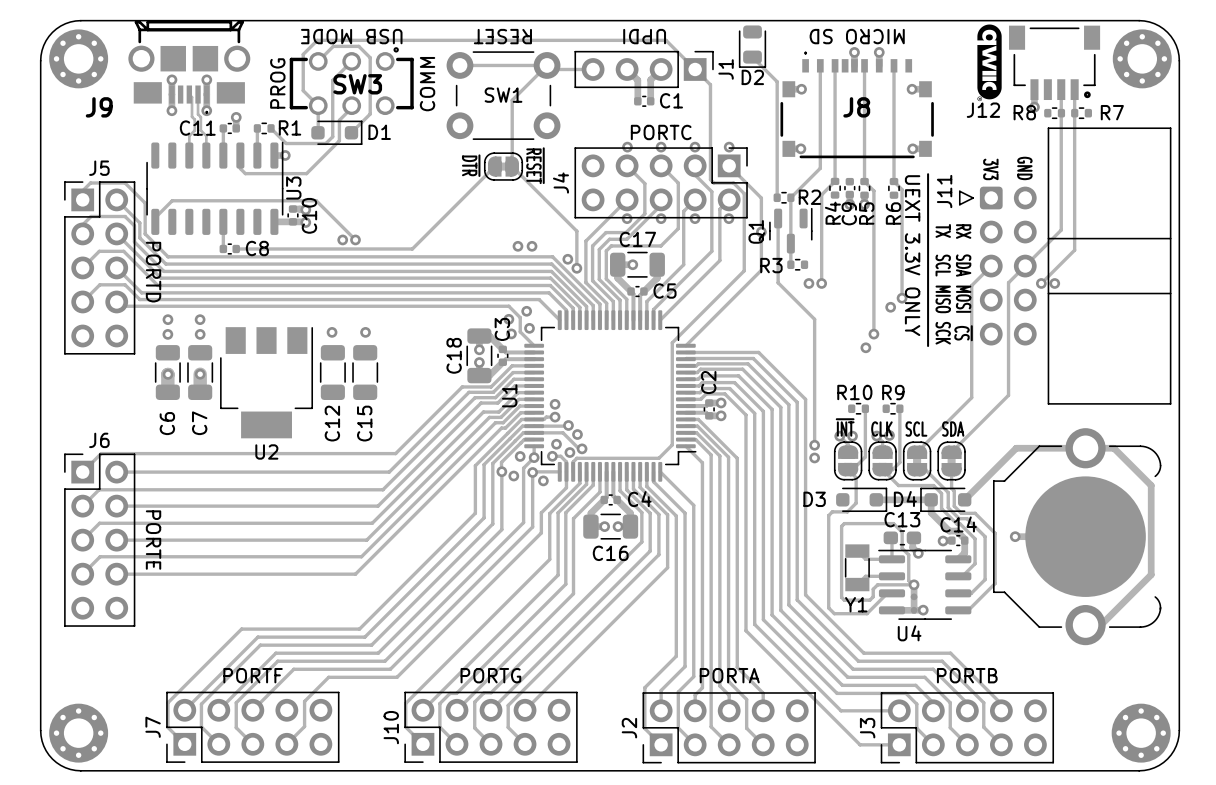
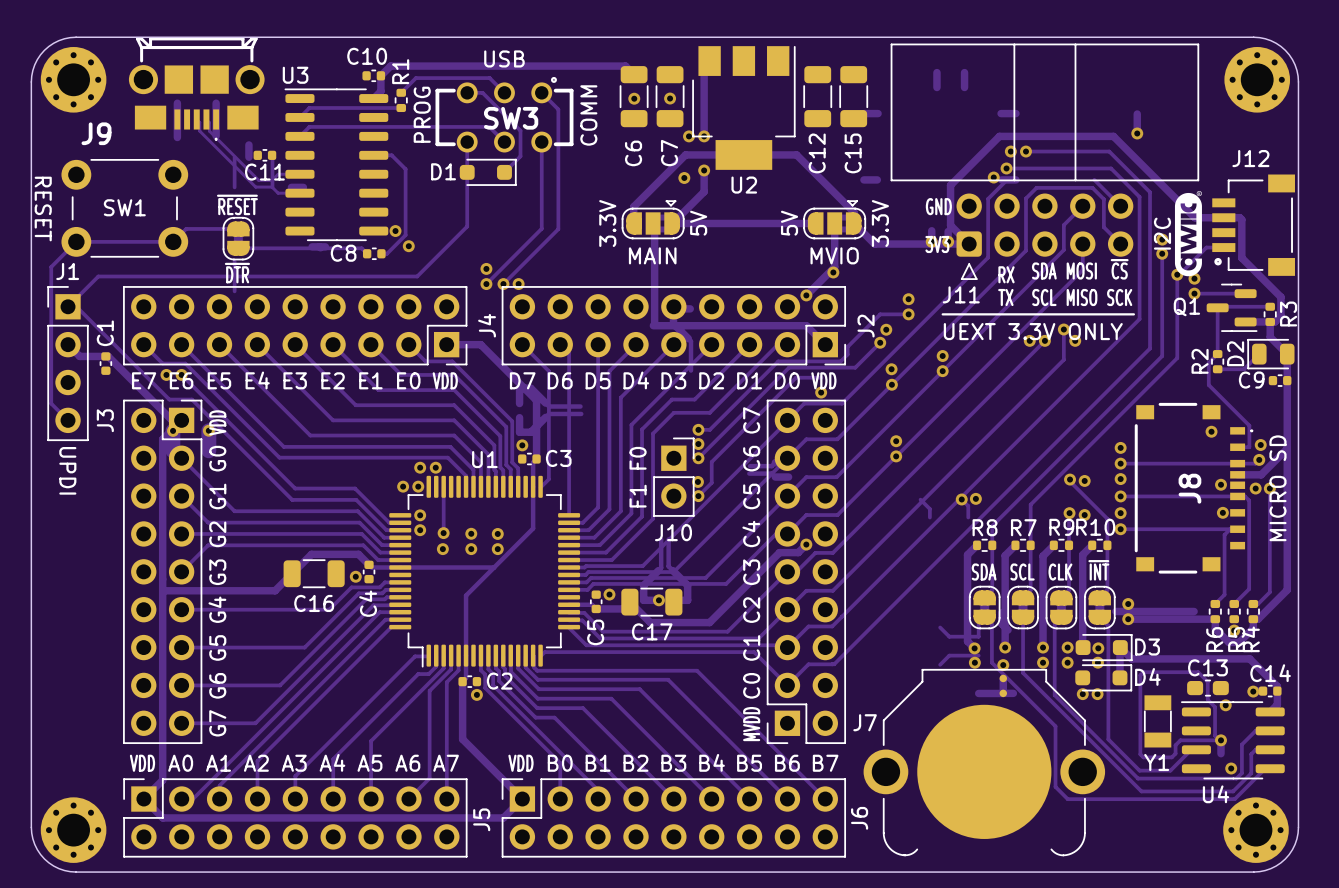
drawing: [977, 24, 1002, 100] -> none
text: USB MODE (351, 36) -> none
text: RESET (502, 36) -> none
text: UPDI (644, 36) -> none
text: MICRO SD (857, 36) -> none
drawing position: (989, 37) -> (1188, 261)
text: none -> USB (504, 58)
track: none -> (709, 61) (704, 66) (704, 136)
D2 rotation: 0° (752, 46) -> 90° clockwise (1270, 354)
D2 position: (752, 46) -> (1270, 354)
via: (854, 52) -> none
via: (879, 52) -> none
track: none -> (634, 74) (625, 66) (390, 66) (380, 75) (380, 91) (373, 98)
track: (752, 57) (777, 81) (777, 197) -> none
track: (318, 61) (333, 46) (358, 46) (370, 57) (370, 114) (351, 132) -> none
track: (351, 61) (332, 80) (332, 136) (326, 143) (286, 143) (271, 128) -> none
J12 rotation: 0° (1054, 62) -> 90° clockwise (1253, 225)
J12 position: (1054, 62) -> (1253, 225)
track: (459, 65) (547, 65) (551, 69) (593, 69) -> none
track: (547, 65) (512, 100) (512, 166) (576, 231) (576, 268) -> none
track: (820, 65) (820, 168) (790, 197) (790, 264) -> none
track: (835, 65) (835, 181) (821, 194) (821, 283) -> none
track: (864, 65) (864, 181) (873, 190) (873, 334) -> none
track: (894, 65) (894, 181) (902, 189) (902, 298) -> none
track: (627, 69) (637, 80) (637, 101) -> none
J1 rotation: 0° (644, 69) -> 90° counterclockwise (68, 363)
J1 position: (644, 69) -> (68, 363)
track: (661, 69) (650, 79) (650, 101) -> none
track: none -> (401, 92) (415, 78) (489, 78) (504, 92)
track: none -> (467, 92) (482, 92) (520, 130) (520, 156) (504, 172)
track: none -> (541, 92) (558, 109) (558, 229) (503, 284)
via: none -> (634, 98)
via: none -> (670, 98)
via: (171, 79) -> none
via: (206, 79) -> none
SW3 position: (351, 81) -> (504, 114)
text position: PROG (277, 83) -> PROG (422, 114)
track: none -> (401, 108) (309, 108) (299, 117)
text position: COMM (427, 84) -> COMM (588, 115)
via: (801, 89) -> none
via: (912, 89) -> none
track: (1061, 89) (1061, 230) (1008, 282) (1008, 395) (951, 452) -> none
track: (1074, 89) (1074, 250) (1041, 283) -> none
track: (198, 94) (198, 114) (200, 117) (200, 130) (206, 135) (206, 155) -> (206, 119) (209, 122) (209, 131) (258, 180) (272, 180) (278, 174) (299, 174)
SW1 position: (503, 95) -> (124, 208)
drawing position: (979, 98) -> (1199, 193)
C1 name position: C1 (671, 100) -> C1 (105, 333)
C1 rotation: 0° (644, 101) -> 90° clockwise (105, 363)
C1 position: (644, 101) -> (105, 363)
track: (192, 104) (194, 130) (189, 135) (189, 155) -> (199, 131) (255, 187) (272, 187) (278, 193) (299, 193)
J8 rotation: 0° (857, 104) -> 90° clockwise (1194, 488)
J8 position: (857, 104) -> (1194, 488)
track: (351, 108) (339, 120) (339, 140) (306, 173) (245, 173) (240, 168) (240, 155) -> none
track: none -> (299, 136) (309, 126) (489, 126) (504, 142)
via: none -> (688, 136)
via: none -> (704, 136)
via: (171, 110) -> none
via: (206, 110) -> none
J12 name position: J12 (983, 110) -> J12 (1250, 158)
R8 name position: R8 (1024, 112) -> R8 (985, 527)
R7 name position: R7 (1112, 112) -> R7 (1023, 527)
R8 position: (1054, 113) -> (984, 545)
R7 position: (1081, 113) -> (1023, 545)
track: none -> (467, 142) (467, 226) (417, 276) (98, 276) (68, 306) (76, 306) (169, 399) (191, 399) (292, 499) (356, 499) (386, 530) (400, 530)
track: none -> (541, 142) (541, 228) (486, 284)
via: (236, 117) -> none
via: none -> (1010, 151)
track: none -> (1025, 151) (1109, 151) (1150, 192) (1150, 348) (832, 664)
via: none -> (1025, 151)
track: none -> (373, 155) (391, 155) (405, 169) (405, 235) (387, 253) (381, 253)
R1 name position: R1 (290, 127) -> R1 (400, 71)
C11 name position: C11 (197, 128) -> C11 (264, 172)
C11 position: (229, 128) -> (264, 155)
R1 rotation: 0° (264, 128) -> 90° clockwise (401, 100)
R1 position: (264, 128) -> (401, 100)
track: (317, 132) (318, 105) (303, 90) (303, 54) (317, 40) (666, 40) (710, 84) (710, 179) (713, 183) (733, 183) (744, 193) (744, 270) (672, 342) (672, 444) (658, 458) (576, 458) (573, 462) (573, 471) -> none
D1 position: (336, 132) -> (488, 172)
D1 name position: D1 (379, 132) -> D1 (443, 171)
text: PORTC (661, 132) -> none
track: none -> (1006, 168) (1111, 168) (1139, 196) (1139, 319) (832, 626) (808, 626) (787, 647) (785, 645) (586, 645) (569, 627)
via: none -> (1006, 168)
track: none -> (704, 170) (704, 191) (672, 223) (815, 223)
via: none -> (993, 177)
J4 footprint: [574, 147, 748, 219] -> [123, 286, 468, 366]
via position: (661, 147) -> (704, 170)
via: (695, 147) -> none
via: (729, 147) -> none
via: (800, 148) -> none
via: (912, 148) -> none
track: none -> (1007, 179) (988, 198) (988, 257) (842, 403) (804, 403) (642, 566) (569, 567)
track: none -> (1094, 179) (1120, 206)
via: (285, 155) -> none
drawing: none -> [1174, 192, 1202, 277]
text rotation: 0° (471, 165) -> 90° counterclockwise (237, 273)
text position: ~{DTR} (471, 165) -> ~{DTR} (237, 273)
text rotation: 0° (535, 165) -> 90° counterclockwise (237, 204)
text position: ~{RESET} (535, 165) -> ~{RESET} (237, 204)
track: (627, 165) (644, 183) (644, 213) (626, 232) (605, 232) (592, 245) (592, 280) (613, 301) (613, 320) -> none
track: (661, 165) (678, 183) (678, 228) (660, 245) (611, 245) (606, 251) (606, 278) (626, 299) (626, 320) -> none
track: (695, 165) (695, 175) (711, 191) (711, 251) (653, 309) (653, 320) -> none
track: (729, 165) (761, 198) (761, 270) (685, 345) -> none
track: (494, 166) (412, 248) (236, 248) -> none
part: (503, 166) -> none
J5 name position: J5 (99, 168) -> J5 (481, 819)
text rotation: 0° (1024, 168) -> 90° counterclockwise (938, 206)
text position: GND (1024, 168) -> GND (938, 206)
text rotation: 0° (990, 169) -> 90° counterclockwise (937, 244)
text position: 3V3 (990, 169) -> 3V3 (937, 244)
track: none -> (1082, 206) (1063, 225) (1063, 249) (836, 477) (806, 477) (705, 577) (591, 577) (586, 582) (569, 582)
text: none -> RESET (43, 209)
line: (928, 174) (928, 346) -> none
J5 footprint: [64, 181, 136, 355] -> [123, 778, 468, 858]
J4 name position: J4 (560, 183) -> J4 (487, 325)
part: none -> (653, 219)
part: none -> (834, 219)
text: none -> 5V (698, 223)
text: none -> 5V (789, 223)
U3 rotation: 0° (214, 188) -> 90° counterclockwise (336, 164)
U3 position: (214, 188) -> (336, 164)
U3 name position: U3 (293, 188) -> U3 (295, 75)
text: none -> 3.3V (607, 223)
track: none -> (633, 223) (633, 206) (685, 154) (796, 154) (854, 212) (854, 223) (874, 244) (969, 244) (950, 225) (950, 185) (999, 136) (1113, 136) (1194, 217) (1239, 217) (1241, 219) (1241, 257) (1280, 297) (1280, 316) (1274, 321) (1245, 321)
track: none -> (653, 223) (654, 324)
track: none -> (834, 223) (834, 267) (806, 295)
text: none -> 3.3V (880, 223)
R4 position: (835, 188) -> (1253, 611)
C9 rotation: 0° (849, 188) -> 90° clockwise (1280, 380)
C9 position: (849, 188) -> (1280, 380)
R5 position: (864, 188) -> (1234, 611)
R6 position: (894, 188) -> (1215, 611)
track: none -> (238, 228) (186, 228) (173, 241) (76, 241) (51, 267) (51, 403) (68, 420)
via: none -> (395, 231)
R2 rotation: 0° (784, 197) -> 90° clockwise (1217, 361)
R2 position: (784, 197) -> (1217, 361)
R2 name position: R2 (809, 197) -> R2 (1200, 361)
text: none -> I2C (1162, 233)
track: (73, 199) (90, 183) (125, 183) (145, 203) (145, 233) (168, 256) (552, 256) (599, 304) (599, 320) -> none
track: (116, 199) (139, 222) (139, 237) (165, 264) (551, 264) (593, 305) (593, 320) -> none
track: (627, 199) (585, 241) (585, 282) (606, 303) (606, 320) -> none
track: (661, 199) (661, 205) (626, 239) (609, 239) (599, 249) (599, 279) (620, 300) (620, 320) -> none
track: (695, 199) (683, 211) (683, 264) (646, 301) (646, 320) -> none
track: (729, 199) (719, 209) (719, 260) (660, 320) -> none
part: none -> (238, 238)
via: none -> (1162, 239)
track: none -> (1082, 244) (1082, 269) (896, 456)
track: none -> (1120, 244) (1103, 227) (1103, 199) (1092, 187) (1036, 187) (1025, 198) (1025, 250) (837, 439) (806, 439) (673, 572) (588, 572) (585, 574) (569, 574)
via: none -> (408, 246)
via: (305, 209) -> none
track: none -> (1223, 247) (1206, 247) (1177, 274) (1177, 358) (1030, 504) (1030, 590) (1023, 597)
track: none -> (238, 248) (361, 248) (367, 253)
C10 rotation: 0° (292, 215) -> 90° clockwise (373, 75)
C10 position: (292, 215) -> (373, 75)
C10 name position: C10 (309, 215) -> C10 (367, 56)
track: none -> (1162, 253) (1162, 356) (992, 526) (992, 590) (984, 597)
via: none -> (1162, 253)
text: none -> MAIN (652, 255)
text: none -> MVIO (834, 255)
via: (627, 218) -> none
via: (661, 218) -> none
via: (695, 218) -> none
via: (728, 218) -> none
track: (778, 218) (778, 282) (814, 319) (814, 445) -> none
track: (155, 221) (155, 217) (172, 200) (316, 200) (355, 239) -> none
track: (274, 221) (305, 221) -> none
via: (305, 222) -> none
via: none -> (486, 268)
Q1 rotation: 0° (790, 230) -> 90° clockwise (1232, 307)
Q1 position: (790, 230) -> (1232, 307)
text rotation: 0° (943, 230) -> 90° counterclockwise (1005, 297)
text position: TX (943, 230) -> TX (1005, 297)
text rotation: 0° (963, 231) -> 90° counterclockwise (1006, 274)
text position: RX (963, 231) -> RX (1006, 274)
track: (73, 233) (91, 216) (125, 216) (134, 225) (134, 241) (163, 271) (551, 271) (586, 306) (586, 320) -> none
track: (116, 233) (160, 278) (550, 278) (579, 307) (579, 320) -> none
via: none -> (1177, 274)
via: none -> (1194, 278)
via: (342, 239) -> none
via: (355, 239) -> none
C17 name position: C17 (637, 239) -> C17 (652, 631)
via: none -> (486, 284)
via: none -> (503, 284)
via: none -> (518, 284)
via: (517, 246) -> none
via: (532, 246) -> none
C8 position: (229, 248) -> (374, 253)
C8 name position: C8 (257, 248) -> C8 (343, 253)
track: none -> (1194, 293) (1245, 293)
via: none -> (1194, 293)
via: none -> (806, 295)
text rotation: 0° (912, 255) -> 90° counterclockwise (1033, 331)
via: none -> (908, 299)
via: (567, 259) -> none
track: none -> (1270, 306) (1217, 307) (1217, 354) (1208, 362) (1208, 385) (1249, 425) (1249, 446) (1237, 447)
via: (632, 264) -> none
C17 position: (637, 264) -> (651, 602)
track: (657, 264) (657, 278) (640, 295) (640, 320) -> none
R3 rotation: 0° (797, 264) -> 90° clockwise (1270, 314)
R3 position: (797, 264) -> (1270, 314)
R3 name position: R3 (771, 265) -> R3 (1288, 314)
text rotation: 0° (943, 265) -> 90° counterclockwise (1044, 297)
text rotation: 0° (963, 265) -> 90° counterclockwise (1044, 271)
text position: SDA (963, 265) -> SDA (1044, 271)
track: (991, 266) (971, 285) (971, 397) (917, 452) -> none
J11 rotation: 0° (1065, 266) -> 90° counterclockwise (1044, 161)
J11 position: (1065, 266) -> (1044, 161)
track: (82, 267) (99, 251) (123, 251) (157, 285) (550, 285) (573, 308) (573, 320) -> none
track: (116, 267) (141, 292) (549, 292) (566, 310) (566, 320) -> none
via: (576, 268) -> none
track: none -> (908, 314) (880, 314) (847, 346) (847, 354) (840, 361) (778, 361) (709, 429) (698, 429)
via: none -> (908, 314)
line: none -> (942, 314) (1133, 314)
text: PORTD (153, 272) -> none
track: none -> (1270, 321) (1270, 337) (1287, 354) (1287, 590) (1258, 619) (1253, 619) (1253, 628) (1239, 642) (1228, 642) (1215, 628) (1215, 619) (1127, 619)
track: none -> (653, 325) (806, 325) (825, 344)
via: (821, 283) -> none
track: none -> (1063, 329) (1063, 359) (832, 590) (806, 590) (758, 638) (600, 638) (582, 620) (569, 620)
via: none -> (1063, 329)
via: (1041, 283) -> none
via: (1054, 283) -> none
C5 rotation: 0° (637, 291) -> 90° clockwise (596, 601)
C5 position: (637, 291) -> (596, 601)
via: none -> (1029, 340)
track: none -> (1044, 340) (832, 552) (815, 552) (796, 571) (787, 571) (727, 631) (603, 631) (584, 612) (569, 612)
via: none -> (1044, 340)
via: none -> (1075, 340)
track: none -> (880, 342) (855, 367) (789, 367) (698, 458)
via: none -> (880, 342)
track: none -> (68, 344) (79, 356) (108, 356) (172, 420) (181, 420) (162, 439) (162, 780) (143, 799) (162, 817) (503, 817) (522, 799) (462, 739) (462, 681) (466, 678) (466, 595) (533, 528) (533, 462) (536, 459) (536, 400) (480, 344) (446, 344)
track: none -> (143, 344) (162, 363) (185, 363) (279, 457) (447, 457) (466, 475) (466, 487)
track: none -> (181, 344) (283, 446) (450, 446) (473, 469) (473, 487)
track: none -> (219, 344) (310, 435) (454, 435) (480, 462) (480, 487)
track: none -> (257, 344) (333, 420) (454, 420) (488, 454) (488, 487)
track: none -> (295, 344) (355, 405) (454, 405) (494, 445) (495, 486)
track: none -> (333, 344) (378, 390) (454, 390) (500, 436) (500, 467) (503, 470) (503, 487)
track: none -> (370, 344) (401, 374) (454, 374) (506, 427) (506, 464) (510, 469) (510, 487)
track: none -> (408, 344) (425, 361) (452, 361) (512, 421) (512, 462) (518, 468) (518, 487)
track: none -> (522, 344) (548, 371) (548, 479) (540, 487)
track: none -> (560, 344) (569, 353) (569, 515)
track: none -> (598, 344) (598, 507) (582, 522) (569, 522)
track: none -> (635, 344) (609, 371) (609, 509) (588, 530) (569, 530)
track: none -> (673, 344) (620, 397) (620, 511) (594, 537) (569, 537)
track: none -> (711, 344) (631, 424) (631, 513) (599, 545) (569, 545)
track: none -> (749, 344) (694, 399) (671, 399) (642, 429) (642, 516) (606, 552) (569, 552)
track: none -> (787, 344) (777, 344) (709, 412) (673, 412) (653, 433) (653, 518) (611, 560) (569, 560)
via: (902, 298) -> none
text rotation: 0° (943, 299) -> 90° counterclockwise (1082, 297)
text position: MISO (943, 299) -> MISO (1082, 297)
text rotation: 0° (963, 299) -> 90° counterclockwise (1081, 271)
text position: MOSI (963, 299) -> MOSI (1081, 271)
track: (82, 301) (99, 284) (125, 284) (139, 299) (539, 299) (559, 320) -> none
track: (107, 301) (111, 306) (508, 306) (520, 317) (520, 331) (534, 345) -> none
track: none -> (1259, 354) (1244, 369) (1217, 369)
via: none -> (942, 356)
via: (890, 307) -> none
via: (526, 311) -> none
via: none -> (891, 369)
via: (167, 319) -> none
via: (200, 319) -> none
via: (508, 319) -> none
via: none -> (942, 371)
via: none -> (166, 374)
track: none -> (181, 374) (295, 488) (355, 488) (389, 522) (400, 522)
via: none -> (181, 374)
track: none -> (821, 377) (796, 377) (711, 462) (711, 482) (698, 496)
via: (529, 328) -> none
text: none -> E7 (144, 380)
text: none -> E6 (181, 380)
text: none -> E5 (219, 380)
text: none -> E4 (257, 380)
text: none -> E3 (295, 380)
text: none -> E2 (333, 380)
text: none -> E1 (370, 380)
text: none -> E0 (408, 380)
text: none -> VDD (445, 380)
text: none -> D7 (522, 380)
text: none -> D6 (560, 380)
text: none -> D5 (598, 380)
text: none -> D4 (636, 380)
text: none -> D3 (673, 380)
text: none -> D2 (711, 380)
text: none -> D1 (749, 380)
text: none -> D0 (787, 380)
text: none -> VDD (823, 380)
via: (332, 332) -> none
via: (365, 332) -> none
via: none -> (891, 384)
via: (511, 333) -> none
text rotation: 0° (943, 333) -> 90° counterclockwise (1119, 297)
text position: SCK (943, 333) -> SCK (1119, 297)
text rotation: 0° (963, 333) -> 90° counterclockwise (1119, 269)
text position: ~{CS} (963, 333) -> ~{CS} (1119, 269)
via: (167, 334) -> none
via: (200, 334) -> none
via: (873, 334) -> none
via: none -> (821, 392)
via: (865, 347) -> none
via: (479, 349) -> none
track: (685, 352) (758, 352) (805, 399) (805, 594) (863, 653) (950, 653) (1001, 704) (1001, 710) -> none
C18: (479, 355) -> none
C3 rotation: 0° (502, 355) -> 90° clockwise (529, 459)
C3 position: (502, 355) -> (529, 459)
track: (685, 359) (753, 358) (797, 402) (797, 599) (858, 661) (942, 661) (983, 702) (983, 727) (1001, 744) -> none
via: (479, 362) -> none
text: none -> C7 (751, 420)
track: (534, 365) (512, 365) (491, 386) (462, 386) (395, 453) (101, 453) (82, 472) -> none
track: (685, 365) (696, 365) (698, 363) (747, 363) (788, 404) (788, 604) (853, 669) (933, 669) (967, 703) (967, 710) -> none
text: none -> VDD (217, 422)
C6 position: (167, 372) -> (634, 96)
C7 position: (200, 372) -> (670, 96)
C12 position: (332, 372) -> (817, 96)
C15 position: (365, 372) -> (853, 96)
track: (534, 372) (513, 372) (493, 392) (469, 392) (389, 472) (116, 472) -> none
track: (685, 372) (697, 372) (700, 369) (742, 369) (780, 407) (780, 610) (847, 677) (924, 677) (950, 702) (950, 727) (967, 744) -> none
via: none -> (698, 429)
via: none -> (1211, 431)
track: (534, 379) (513, 379) (495, 397) (475, 397) (382, 489) (99, 489) (82, 506) -> none
track: (685, 379) (698, 379) (701, 375) (738, 375) (772, 409) (772, 615) (842, 685) (915, 685) (933, 702) (933, 710) -> none
U2 position: (266, 382) -> (743, 107)
via: none -> (896, 441)
track: (534, 385) (514, 385) (497, 403) (481, 403) (377, 506) (116, 506) -> none
track: (685, 385) (699, 385) (702, 382) (734, 382) (763, 411) (763, 619) (837, 693) (906, 693) (916, 704) (916, 728) (933, 744) -> none
via: none -> (698, 444)
via: none -> (522, 445)
via: none -> (1260, 444)
via: none -> (1120, 447)
track: none -> (1287, 448) (1261, 474) (1237, 474)
track: (534, 392) (518, 392) (498, 412) (483, 412) (372, 523) (99, 523) (82, 540) -> none
track: (685, 392) (699, 392) (703, 388) (729, 388) (754, 413) (754, 624) (841, 710) (899, 710) -> none
U1 rotation: 0° (610, 396) -> 90° clockwise (484, 571)
U1 position: (610, 396) -> (484, 571)
track: none -> (896, 456) (837, 515) (806, 515) (787, 533) (776, 533) (726, 583) (593, 583) (587, 589) (569, 589)
via: none -> (896, 456)
track: none -> (181, 458) (234, 511) (357, 511) (384, 537) (400, 537)
text: none -> F0 (638, 458)
via: none -> (698, 458)
text: none -> G0 (217, 458)
track: (534, 399) (519, 399) (501, 417) (489, 417) (366, 540) (116, 540) -> none
track: (685, 399) (700, 399) (706, 393) (724, 393) (745, 415) (745, 630) (860, 744) (899, 744) -> none
text: none -> C6 (751, 458)
track: none -> (1259, 459) (1255, 463) (1120, 463)
via: none -> (1259, 459)
via: (721, 402) -> none
via: none -> (1120, 463)
via: (555, 404) -> none
track: (534, 406) (519, 406) (503, 422) (495, 422) (361, 556) (100, 556) (82, 574) -> none
via: none -> (420, 467)
via: none -> (435, 467)
R10 position: (858, 408) -> (1099, 545)
track: (865, 408) (865, 457) (852, 469) (848, 469) (856, 477) (856, 503) (847, 511) (832, 511) (828, 515) (828, 608) (834, 613) (867, 613) (887, 593) (891, 593) -> none
R9 position: (893, 408) -> (1061, 545)
track: (899, 408) (899, 462) (892, 469) (882, 469) (898, 485) (933, 485) (941, 493) (941, 508) (975, 538) (975, 563) (962, 576) (958, 576) -> none
C2 rotation: 0° (709, 409) -> 90° clockwise (469, 681)
C2 position: (709, 409) -> (469, 681)
text: none -> UPDI (67, 470)
track: (534, 412) (520, 412) (505, 428) (501, 428) (355, 574) (116, 574) -> none
via: (721, 415) -> none
track: (555, 417) (546, 417) (544, 419) (521, 419) (475, 465) (475, 513) (359, 629) (241, 629) (167, 702) (167, 727) (184, 744) -> none
via: (555, 417) -> none
via: none -> (1120, 479)
track: none -> (1070, 479) (1107, 518) (1107, 590) (1099, 597)
via: none -> (1070, 479)
track: (685, 419) (698, 419) (737, 458) (737, 667) (763, 693) (763, 710) -> none
via: none -> (1084, 480)
via: none -> (697, 481)
via: none -> (1220, 484)
via: none -> (403, 486)
via: none -> (418, 486)
track: none -> (443, 486) (443, 533)
track: (568, 425) (522, 426) (484, 464) (484, 517) (364, 637) (257, 637) (184, 710) -> none
via: (568, 425) -> none
text: none -> MICRO SD (1277, 488)
track: (685, 426) (697, 426) (728, 457) (728, 681) (746, 699) (746, 728) (763, 744) -> none
via: none -> (1255, 488)
track: none -> (1269, 488) (1269, 592) (1258, 603) (1253, 603)
via: none -> (1269, 488)
text position: ~{INT} (845, 427) -> ~{INT} (1098, 570)
text position: CLK (881, 429) -> CLK (1060, 572)
text position: SCL (916, 429) -> SCL (1022, 572)
text position: SDA (953, 429) -> SDA (984, 572)
track: none -> (181, 496) (208, 522) (359, 522) (382, 545) (400, 545)
via: none -> (698, 496)
track: (685, 432) (696, 432) (719, 456) (719, 686) (729, 695) (729, 710) -> none
text: none -> G1 (217, 496)
text: none -> F1 (638, 496)
text: none -> C5 (751, 496)
track: none -> (1120, 496) (1245, 496) (1249, 500) (1249, 589) (1234, 603)
via: none -> (1120, 496)
via: (577, 434) -> none
via: (839, 436) -> none
via: (852, 436) -> none
track: (534, 439) (524, 439) (501, 462) (501, 529) (378, 653) (275, 653) (218, 710) -> none
track: (685, 439) (695, 439) (711, 454) (711, 726) (729, 744) -> none
J6 name position: J6 (99, 440) -> J6 (859, 818)
via: (556, 444) -> none
via: (814, 445) -> none
track: (534, 446) (534, 457) (523, 468) (523, 522) (384, 661) (277, 661) (236, 702) (236, 727) (252, 744) -> none
track: (685, 446) (702, 462) (702, 687) (695, 695) (695, 710) -> none
track: (582, 448) (579, 448) (562, 432) (523, 432) (492, 463) (492, 523) (371, 645) (260, 645) (201, 704) (201, 726) (218, 744) -> none
via: (582, 448) -> none
track: none -> (1069, 513) (1069, 590) (1061, 597)
via: none -> (1069, 513)
via: none -> (1120, 513)
via: none -> (1222, 512)
via: none -> (1084, 515)
via: none -> (420, 515)
via: (569, 452) -> none
J6 footprint: [64, 453, 136, 627] -> [501, 778, 847, 858]
via: (520, 456) -> none
track: (552, 456) (560, 456) (566, 461) (566, 487) (541, 512) (541, 532) (397, 677) (328, 677) (304, 701) (304, 726) (286, 744) -> none
via: (552, 456) -> none
via: (534, 457) -> none
via: (814, 457) -> none
part: (848, 460) -> none
part: (882, 460) -> none
part: (917, 460) -> none
part: (951, 460) -> none
track: none -> (1120, 529) (1237, 529)
via: none -> (1120, 529)
track: none -> (1230, 529) (1224, 534) (1224, 594) (1215, 603)
via: none -> (420, 530)
via: none -> (443, 533)
via: none -> (471, 533)
track: none -> (181, 533) (361, 533) (380, 552) (400, 552)
text: none -> G2 (217, 534)
via: none -> (497, 533)
text: none -> C4 (751, 534)
track: (917, 469) (925, 469) (948, 492) (948, 507) (959, 518) (967, 518) (985, 536) (985, 579) (971, 593) (958, 593) -> none
track: (951, 469) (954, 506) (961, 513) (975, 513) (995, 533) (995, 583) (968, 610) (953, 610) -> none
via: (501, 471) -> none
track: (559, 471) (532, 472) (532, 526) (390, 669) (293, 669) (252, 710) -> none
track: (579, 471) (579, 483) (549, 513) (549, 559) (405, 703) (405, 727) (422, 744) -> none
track: (586, 471) (586, 484) (558, 512) (558, 575) (422, 710) -> none
track: (593, 471) (593, 485) (565, 512) (565, 584) (456, 693) (450, 693) (439, 703) (439, 727) (456, 744) -> none
track: (599, 471) (599, 492) (573, 518) (573, 593) (456, 710) -> none
track: (620, 471) (620, 490) (641, 512) (641, 542) (491, 692) (484, 692) (474, 702) (474, 728) (491, 744) -> none
track: (626, 471) (626, 489) (650, 513) (650, 551) (491, 710) -> none
track: (633, 471) (633, 489) (658, 514) (658, 554) (508, 705) (508, 727) (525, 744) -> none
track: (640, 471) (640, 487) (667, 514) (667, 567) (525, 710) -> none
track: (646, 471) (646, 486) (676, 516) (676, 656) (644, 687) (644, 728) (661, 744) -> none
track: (653, 471) (653, 481) (685, 513) (685, 666) (661, 690) (661, 710) -> none
track: (660, 471) (693, 505) (693, 676) (678, 692) (678, 728) (695, 744) -> none
via: (532, 472) -> none
via: (513, 476) -> none
track: none -> (806, 544) (798, 552) (779, 552) (709, 622) (650, 622) (629, 602) (623, 608) (596, 608) (592, 604) (569, 604)
via: none -> (806, 544)
track: none -> (977, 545) (967, 554) (967, 641) (974, 648)
track: none -> (1015, 545) (1005, 555) (1005, 647)
track: none -> (1053, 545) (1043, 556) (1043, 647)
track: none -> (1092, 545) (1082, 554) (1083, 647)
via: none -> (442, 549)
via: none -> (471, 549)
via: none -> (497, 549)
via: (543, 480) -> none
track: none -> (400, 560) (378, 560) (363, 545) (208, 545) (181, 571)
track: none -> (494, 567) (371, 567) (358, 554) (311, 554) (275, 590) (162, 590)
C4 rotation: 0° (610, 499) -> 90° clockwise (369, 571)
C4 position: (610, 499) -> (369, 571)
D3 name position: D3 (814, 499) -> D3 (1147, 647)
D3 position: (861, 499) -> (1104, 647)
track: (876, 499) (931, 499) (931, 512) (949, 531) (956, 531) (964, 539) (964, 552) (958, 559) -> none
D4 rotation: 0° (945, 499) -> 180° (1103, 677)
D4 position: (945, 499) -> (1103, 677)
track: (964, 499) (1016, 448) (1113, 448) (1151, 485) (1151, 574) (1100, 625) (1085, 625) -> none
text: none -> G3 (217, 572)
text: none -> C3 (751, 572)
via: none -> (355, 576)
track: none -> (399, 582) (384, 582) (379, 587) (351, 587) (329, 609) (181, 609)
track: none -> (399, 589) (385, 589) (382, 593) (358, 593) (304, 647) (181, 647)
via: none -> (609, 594)
track: none -> (400, 597) (366, 599) (280, 685) (181, 685)
C16 position: (610, 526) -> (314, 573)
via: (618, 526) -> none
via: none -> (1128, 604)
track: none -> (400, 604) (373, 605) (255, 723) (181, 723)
part: none -> (984, 607)
part: none -> (1023, 607)
part: none -> (1061, 607)
part: none -> (1099, 607)
text: none -> G4 (217, 609)
text: none -> C2 (751, 610)
via: (1015, 536) -> none
part rotation: 0° (1077, 536) -> 90° clockwise (984, 762)
part position: (1077, 536) -> (984, 762)
track: none -> (400, 612) (379, 612) (192, 799) (181, 799)
C13 position: (902, 537) -> (1207, 688)
text: PORTE (153, 540) -> none
C14 position: (958, 540) -> (1270, 691)
track: none -> (984, 617) (991, 624) (991, 662) (1055, 726) (1055, 786) (1067, 799) (1234, 799) (1265, 768) (1270, 768)
track: none -> (1023, 617) (1023, 672) (1141, 791) (1233, 791) (1251, 773) (1251, 754) (1255, 749) (1270, 749)
via: (943, 541) -> none
track: none -> (1061, 617) (1054, 624) (1054, 695) (1138, 778) (1236, 778) (1241, 773) (1241, 744) (1255, 730) (1270, 730)
track: none -> (1099, 617) (1108, 625) (1108, 739) (1139, 770) (1170, 770) (1191, 749) (1196, 749)
via: none -> (1128, 619)
track: none -> (399, 619) (385, 619) (219, 785) (219, 799)
track: none -> (399, 627) (391, 627) (257, 761) (257, 799)
via position: (918, 553) -> (1005, 647)
via: none -> (1234, 630)
Y1 position: (857, 567) -> (1157, 721)
text: none -> G5 (217, 647)
text: none -> C1 (751, 647)
via: none -> (974, 648)
via: none -> (1043, 647)
via: none -> (1067, 647)
via: none -> (1098, 648)
track: none -> (541, 655) (544, 652) (754, 652) (787, 685) (808, 664) (832, 664)
track: none -> (428, 656) (415, 656) (295, 776) (295, 799)
track: none -> (436, 656) (436, 666) (428, 674) (418, 674) (333, 759) (333, 799)
track: none -> (443, 656) (443, 668) (371, 741) (371, 799)
track: none -> (451, 656) (451, 669) (429, 690) (429, 778) (408, 799)
track: none -> (458, 656) (458, 670) (446, 682) (446, 799)
track: none -> (480, 656) (480, 670) (485, 674) (485, 687) (560, 763) (560, 799)
track: none -> (488, 656) (488, 669) (493, 674) (493, 685) (598, 790) (598, 799)
track: none -> (495, 656) (495, 668) (499, 671) (499, 681) (535, 717) (554, 717) (635, 799)
track: none -> (503, 656) (505, 675) (537, 708) (582, 708) (673, 799)
track: none -> (510, 656) (511, 671) (537, 698) (611, 698) (711, 799)
track: none -> (518, 656) (518, 668) (538, 689) (639, 689) (749, 799)
track: none -> (525, 656) (525, 667) (537, 679) (668, 679) (787, 799)
track: none -> (533, 656) (534, 667) (537, 670) (697, 670) (825, 799)
via: none -> (974, 662)
via: none -> (1043, 662)
via: none -> (1067, 662)
via: none -> (1097, 662)
track: (912, 584) (908, 580) (908, 554) (902, 548) (902, 532) (893, 523) (844, 523) (841, 526) (841, 597) (844, 600) (869, 600) (873, 596) (873, 589) (877, 584) (914, 584) (914, 596) -> (1219, 740) (1215, 735) (1215, 707) (1207, 699) (1207, 681) (1198, 672) (1143, 672) (1140, 675) (1140, 754) (1143, 757) (1171, 757) (1175, 753) (1175, 745) (1180, 740) (1220, 740) (1220, 753)
U4 position: (924, 584) -> (1232, 740)
track: none -> (1119, 677) (1120, 647) (1131, 658) (1249, 658) (1277, 686) (1277, 704) (1270, 711)
text: none -> G6 (217, 685)
text: none -> C0 (751, 685)
via: none -> (1253, 691)
via: (923, 610) -> none
via: none -> (1082, 694)
via: none -> (1097, 694)
via: none -> (476, 694)
via: none -> (1225, 705)
text: none -> G7 (217, 723)
text: none -> MVDD (751, 724)
via: none -> (1220, 740)
text: none -> A4 (332, 762)
text: none -> B4 (712, 762)
text: none -> VDD (142, 763)
text: none -> A0 (180, 763)
text: none -> A1 (218, 763)
text: none -> A3 (294, 763)
text: none -> A5 (369, 763)
text: none -> A6 (407, 763)
text: none -> A7 (446, 763)
text: none -> B0 (560, 763)
text: none -> B1 (598, 763)
text: none -> B2 (635, 763)
text: none -> B3 (673, 763)
text: none -> B5 (749, 763)
text: none -> B7 (825, 763)
text: PORTF (253, 675) -> A2 (256, 763)
text: PORTG (490, 675) -> VDD (520, 763)
text: PORTA (729, 675) -> B6 (787, 763)
text: PORTB (967, 675) -> none
via: none -> (1231, 768)
J7 footprint: [166, 691, 340, 763] -> [766, 399, 847, 745]
J10 footprint: [404, 691, 578, 763] -> [653, 437, 695, 517]
J2 footprint: [642, 692, 816, 764] -> [501, 286, 847, 366]
J3 footprint: [880, 692, 1055, 764] -> [123, 399, 203, 745]
J7 name position: J7 (153, 727) -> J7 (865, 722)
J10 name position: J10 (391, 727) -> J10 (673, 532)
J2 name position: J2 (629, 728) -> J2 (866, 326)
J3 name position: J3 (867, 728) -> J3 (105, 420)

